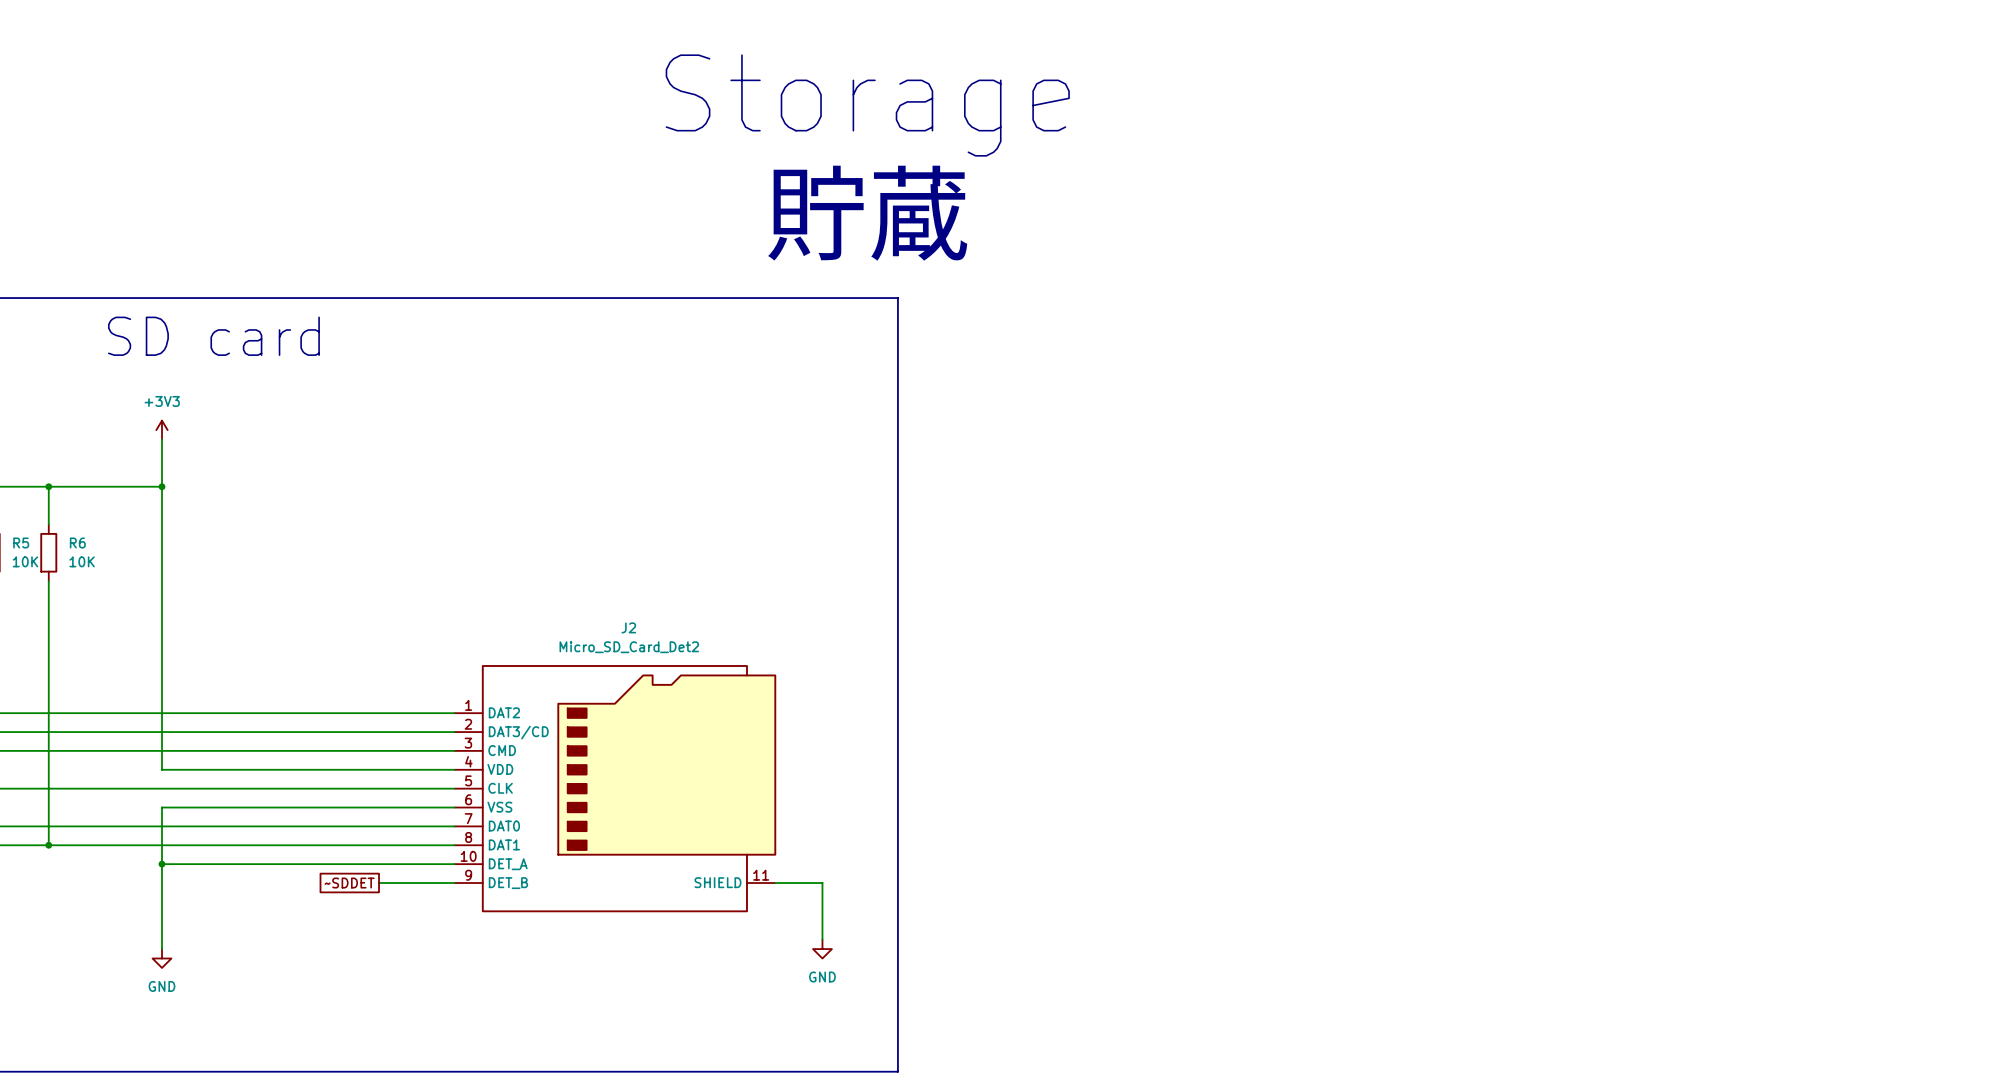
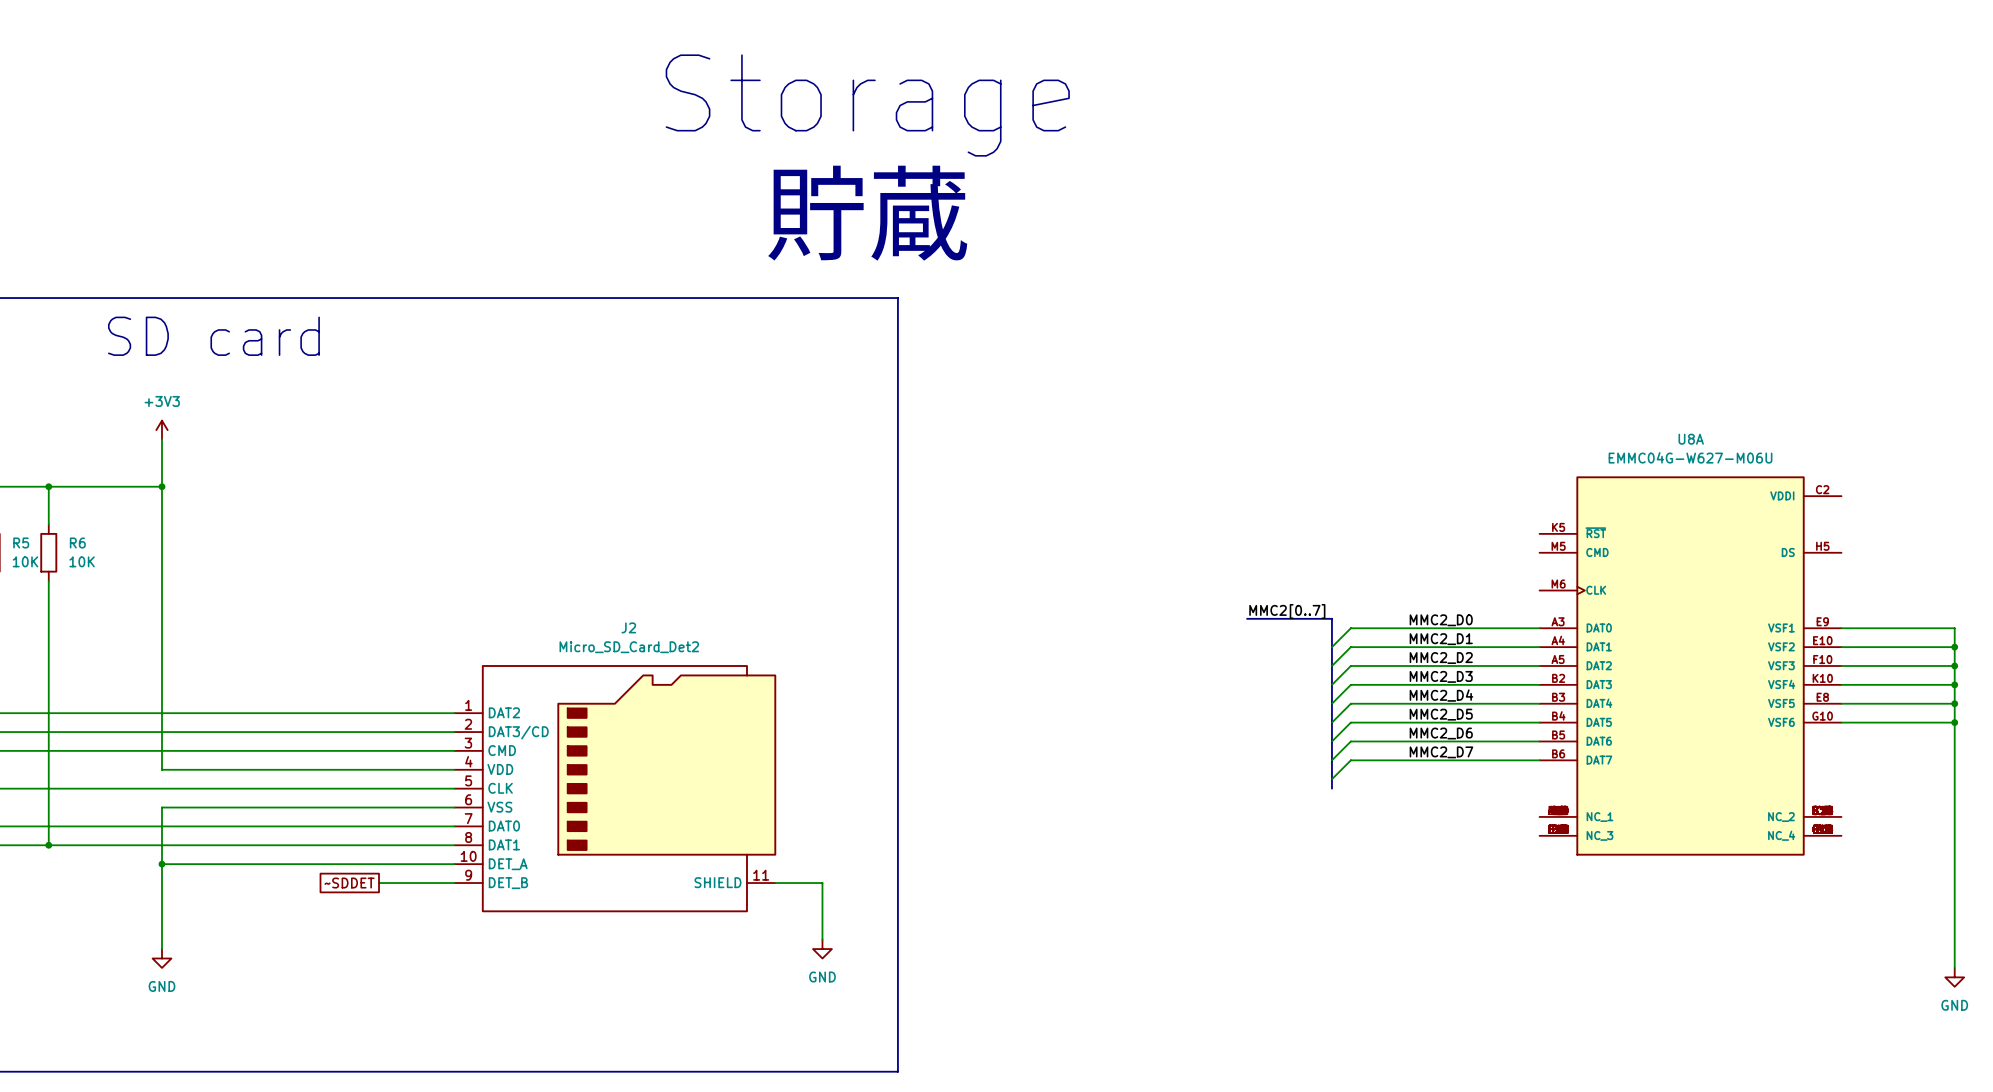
label: none -> MMC2[0..7] (1287, 611)
bus: none -> (1247, 618) (1331, 618) (1331, 788)
label: none -> MMC2_D0 (1441, 620)
wire: none -> (1539, 628) (1350, 628) (1331, 647)
wire: none -> (1841, 628) (1954, 628) (1954, 967)
label: none -> MMC2_D1 (1441, 639)
wire: none -> (1539, 647) (1350, 647) (1331, 666)
wire: none -> (1841, 647) (1954, 647)
junction: none -> (1954, 647)
label: none -> MMC2_D2 (1441, 658)
wire: none -> (1539, 666) (1350, 666) (1331, 684)
U8A: none -> EMMC04G-W627-M06U (1690, 666)
wire: none -> (1841, 666) (1954, 666)
junction: none -> (1954, 666)
label: none -> MMC2_D3 (1441, 676)
wire: none -> (1539, 684) (1350, 684) (1331, 703)
wire: none -> (1841, 684) (1954, 684)
junction: none -> (1954, 684)
label: none -> MMC2_D4 (1441, 695)
wire: none -> (1539, 703) (1350, 703) (1331, 722)
wire: none -> (1841, 703) (1954, 703)
junction: none -> (1954, 703)
label: none -> MMC2_D5 (1441, 714)
wire: none -> (1539, 722) (1350, 722) (1331, 741)
wire: none -> (1841, 722) (1954, 722)
junction: none -> (1954, 722)
label: none -> MMC2_D6 (1441, 733)
wire: none -> (1539, 741) (1350, 741) (1331, 760)
label: none -> MMC2_D7 (1441, 752)
wire: none -> (1539, 760) (1350, 760) (1331, 779)
power symbol: none -> GND (1954, 977)

